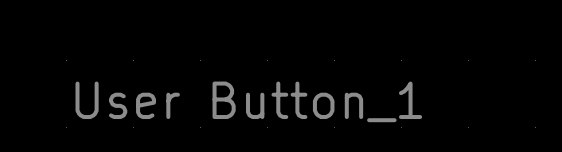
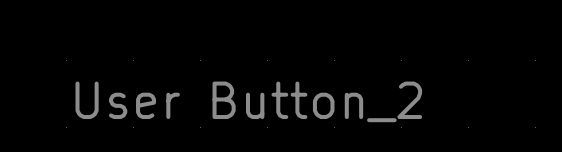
text: User Button_1 (248, 101) -> User Button_2 (248, 101)

